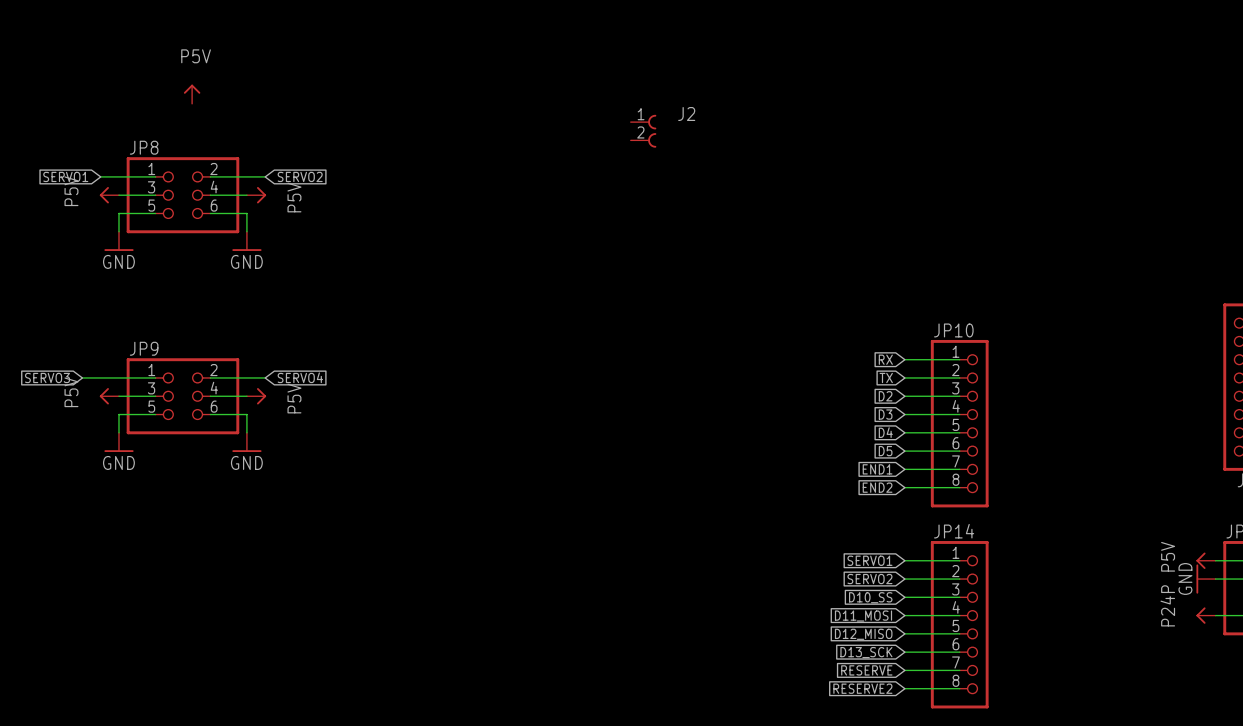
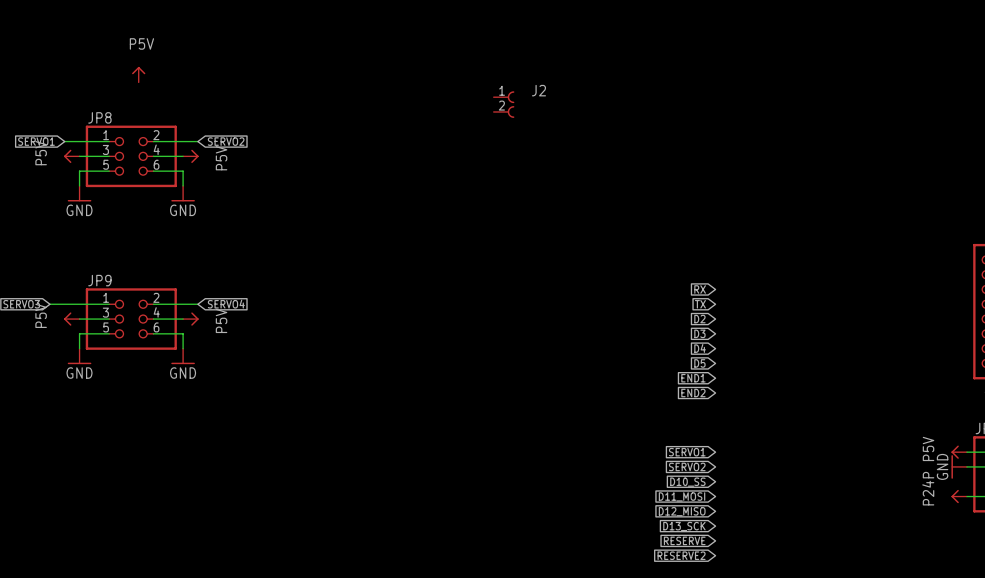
wire: (904, 359) (959, 359) -> none
wire: (904, 377) (959, 377) -> none
wire: (904, 396) (959, 396) -> none
wire: (904, 414) (959, 414) -> none
JP10: (959, 423) -> none
wire: (904, 432) (959, 432) -> none
wire: (904, 451) (959, 451) -> none
wire: (904, 469) (959, 469) -> none
wire: (904, 487) (959, 487) -> none
wire: (904, 560) (959, 560) -> none
wire: (904, 579) (959, 579) -> none
wire: (904, 597) (959, 597) -> none
wire: (904, 615) (959, 615) -> none
JP14: (959, 624) -> none
wire: (904, 633) (959, 633) -> none
wire: (904, 652) (959, 652) -> none
wire: (904, 670) (959, 670) -> none
wire: (904, 688) (959, 688) -> none

